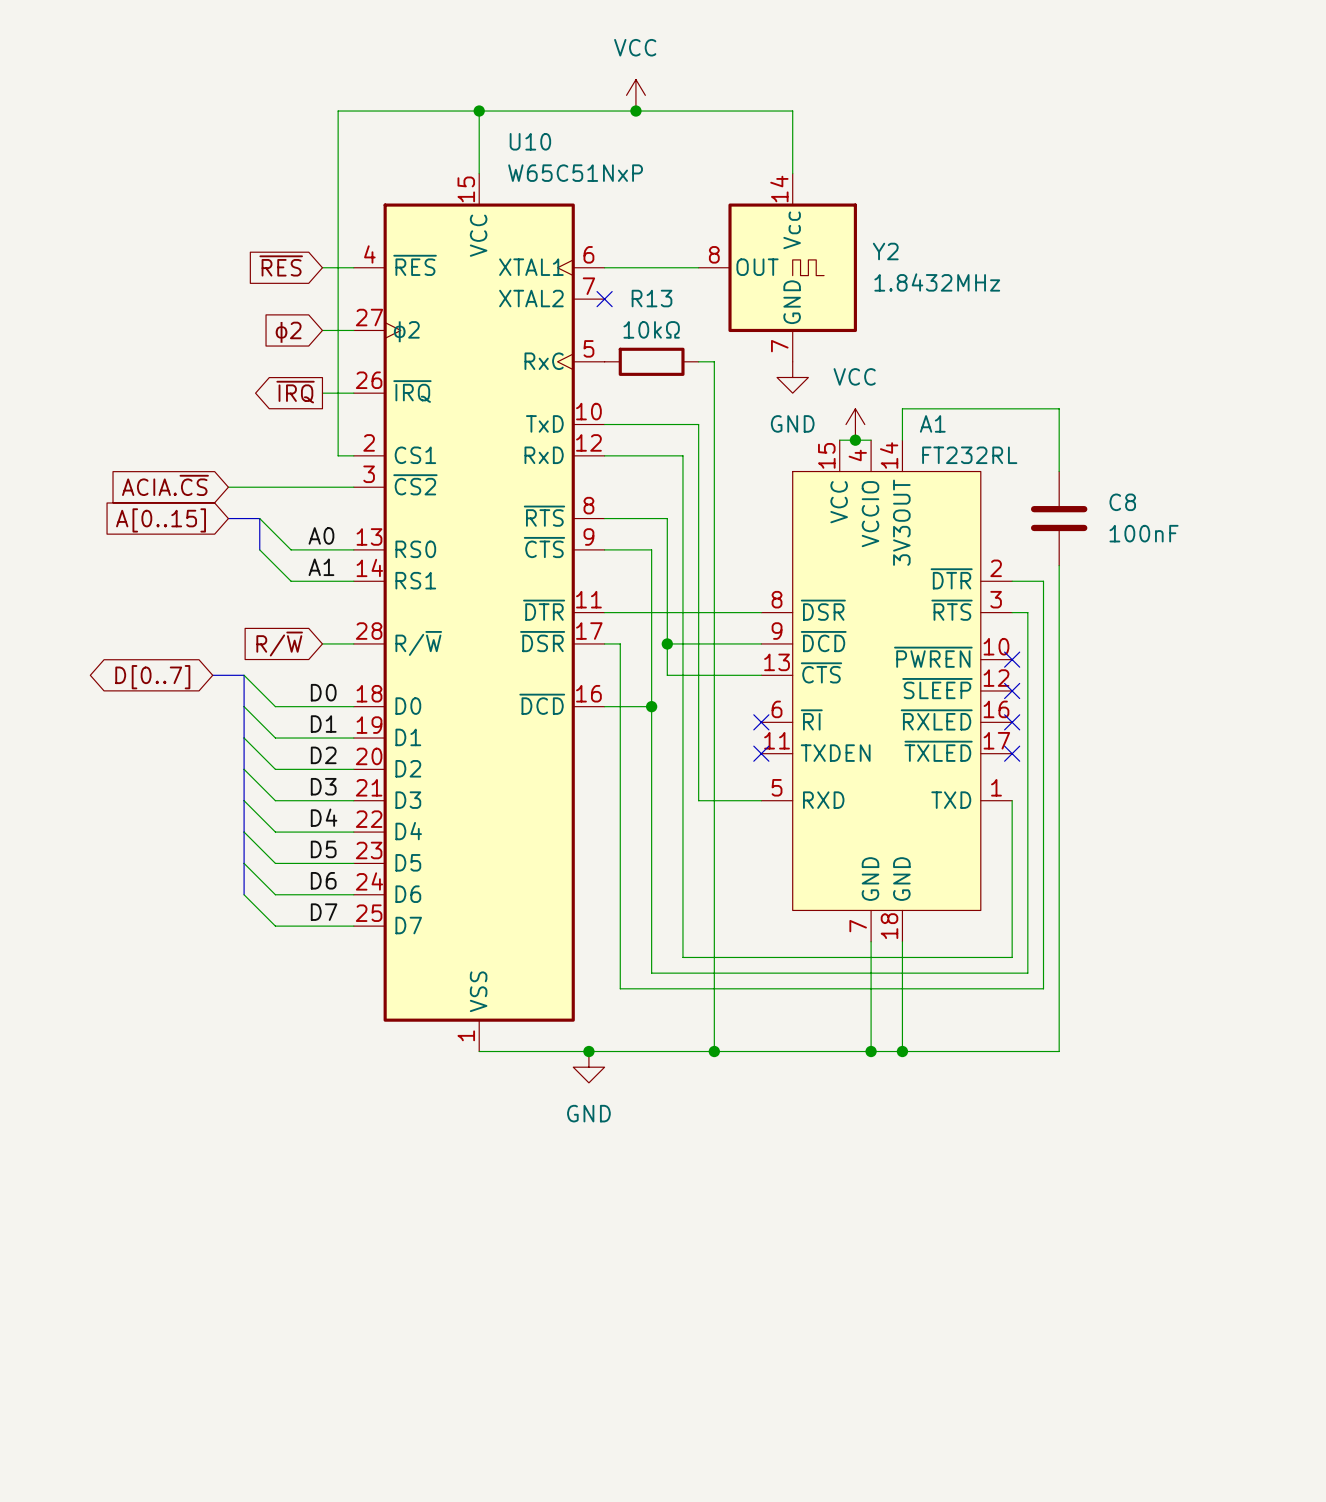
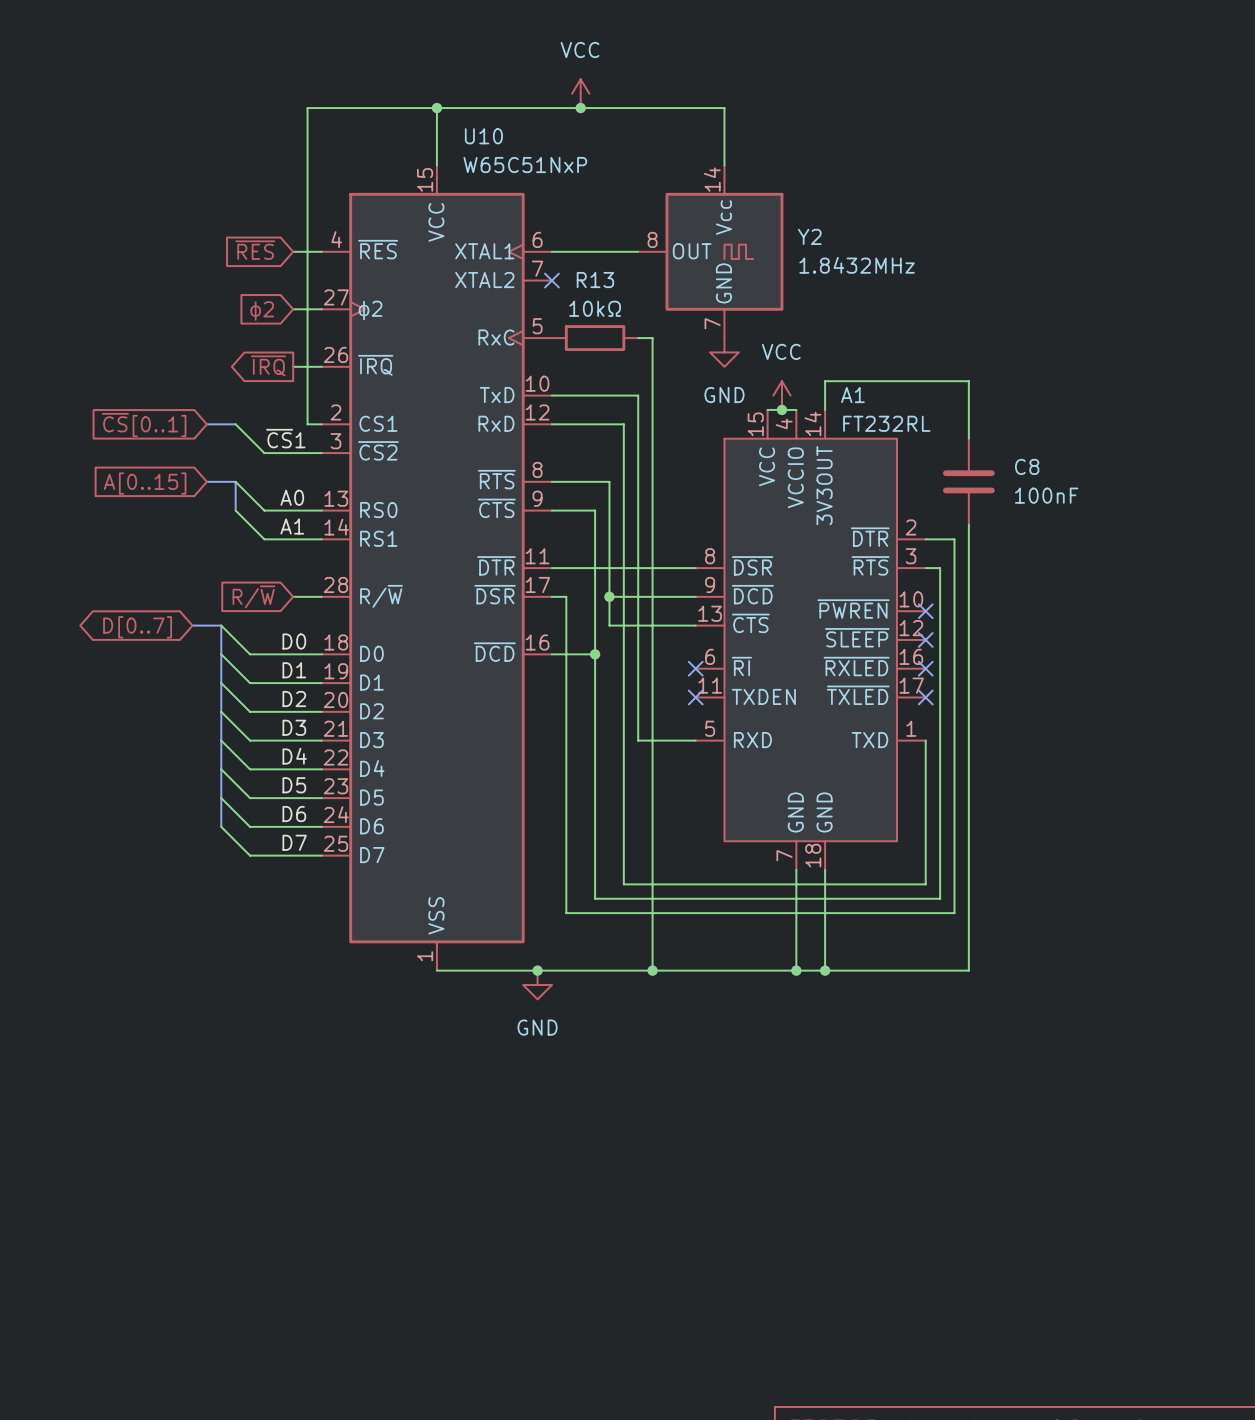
bus: none -> (206, 424) (235, 424)
global label: none -> ~{CS}[0..1] (144, 425)
label: none -> ~{CS}1 (285, 438)
global label: ACIA.~{CS} (165, 485) -> none
wire: (228, 487) (291, 487) -> (235, 424) (264, 453)

